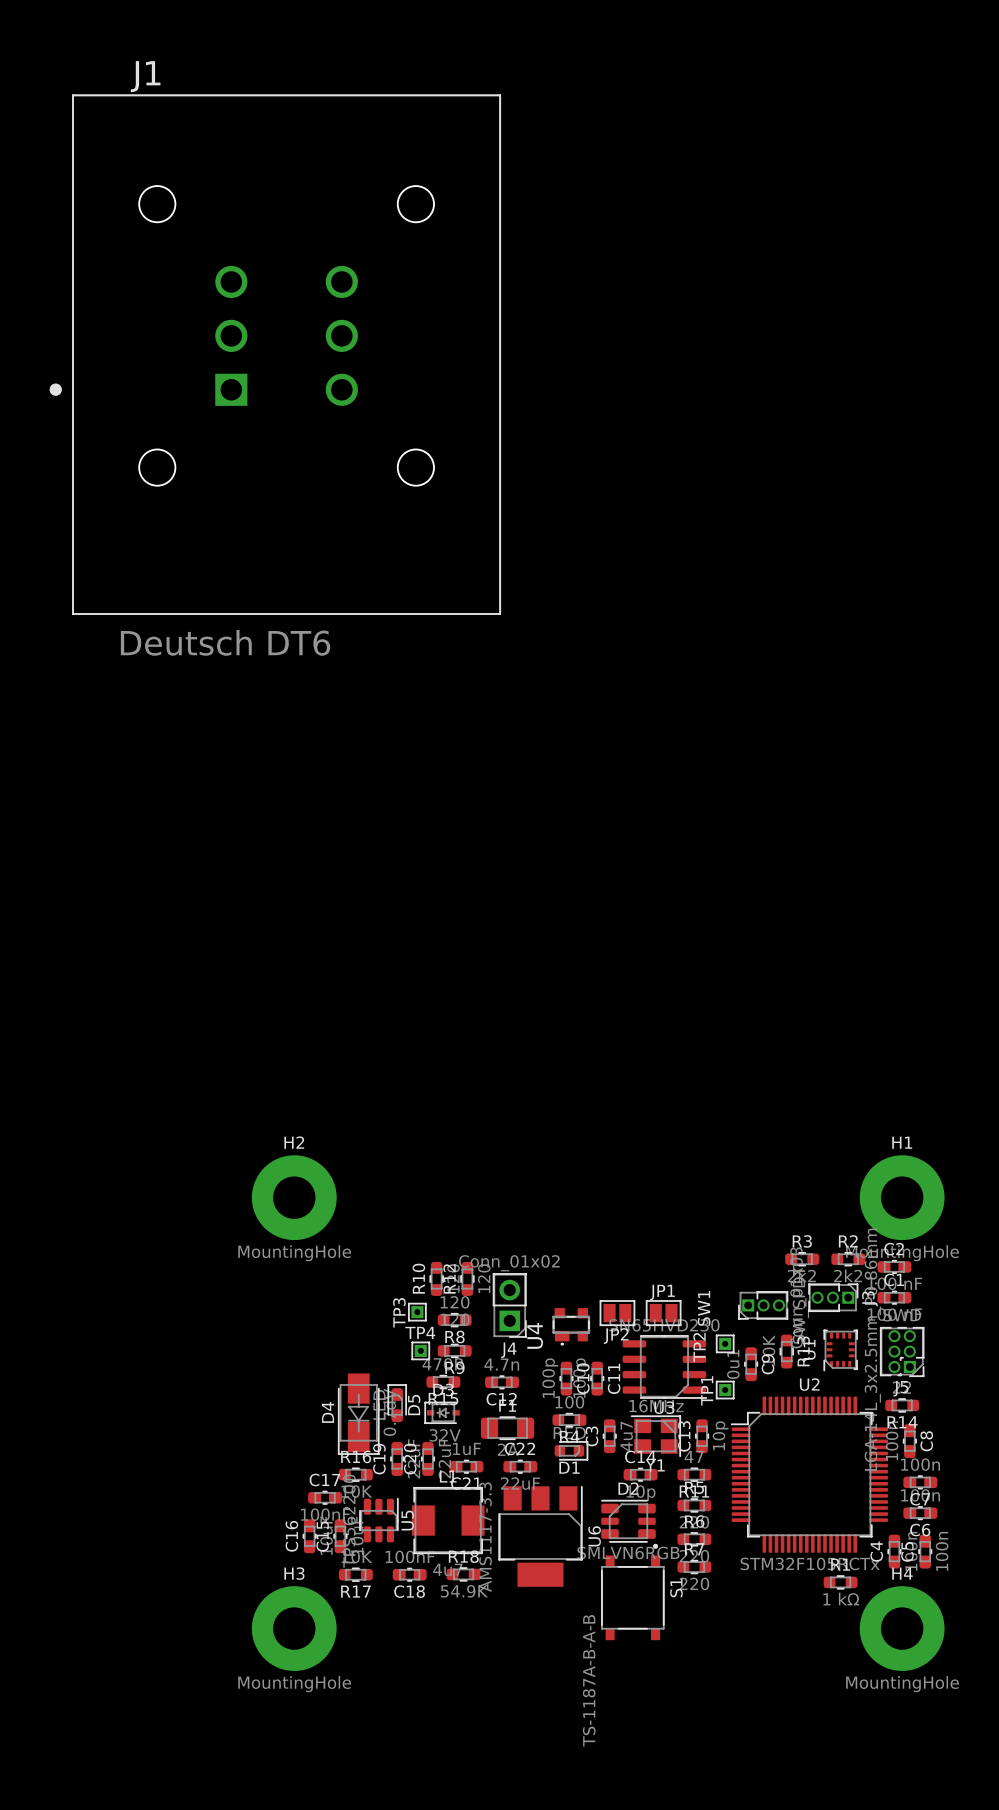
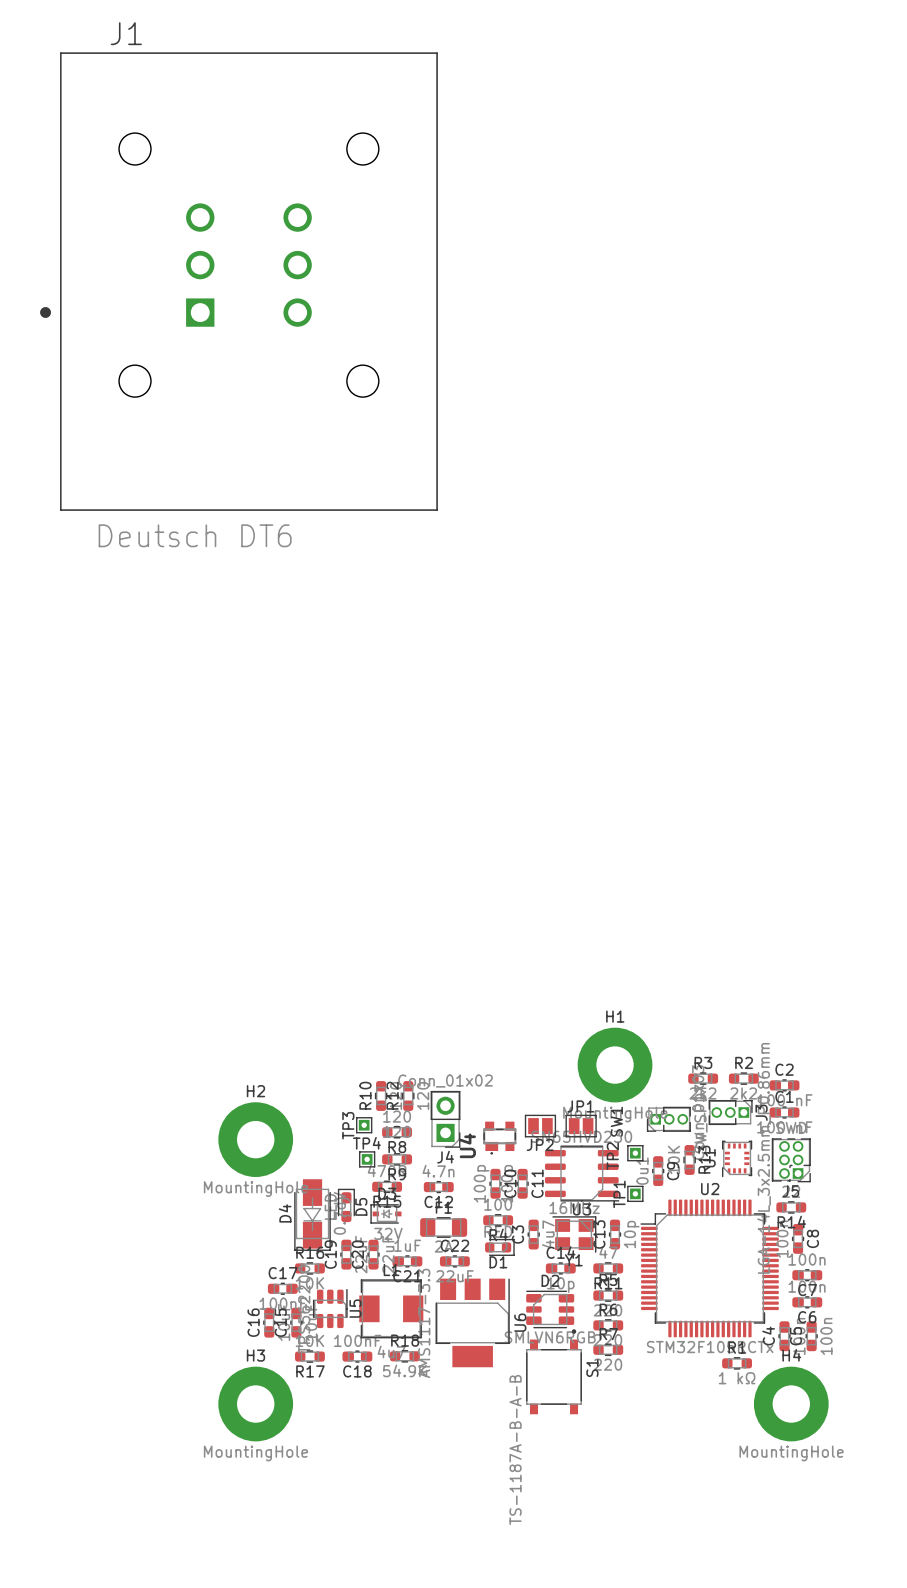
H2 position: (294, 1197) -> (255, 1139)
H1 position: (902, 1197) -> (615, 1065)

